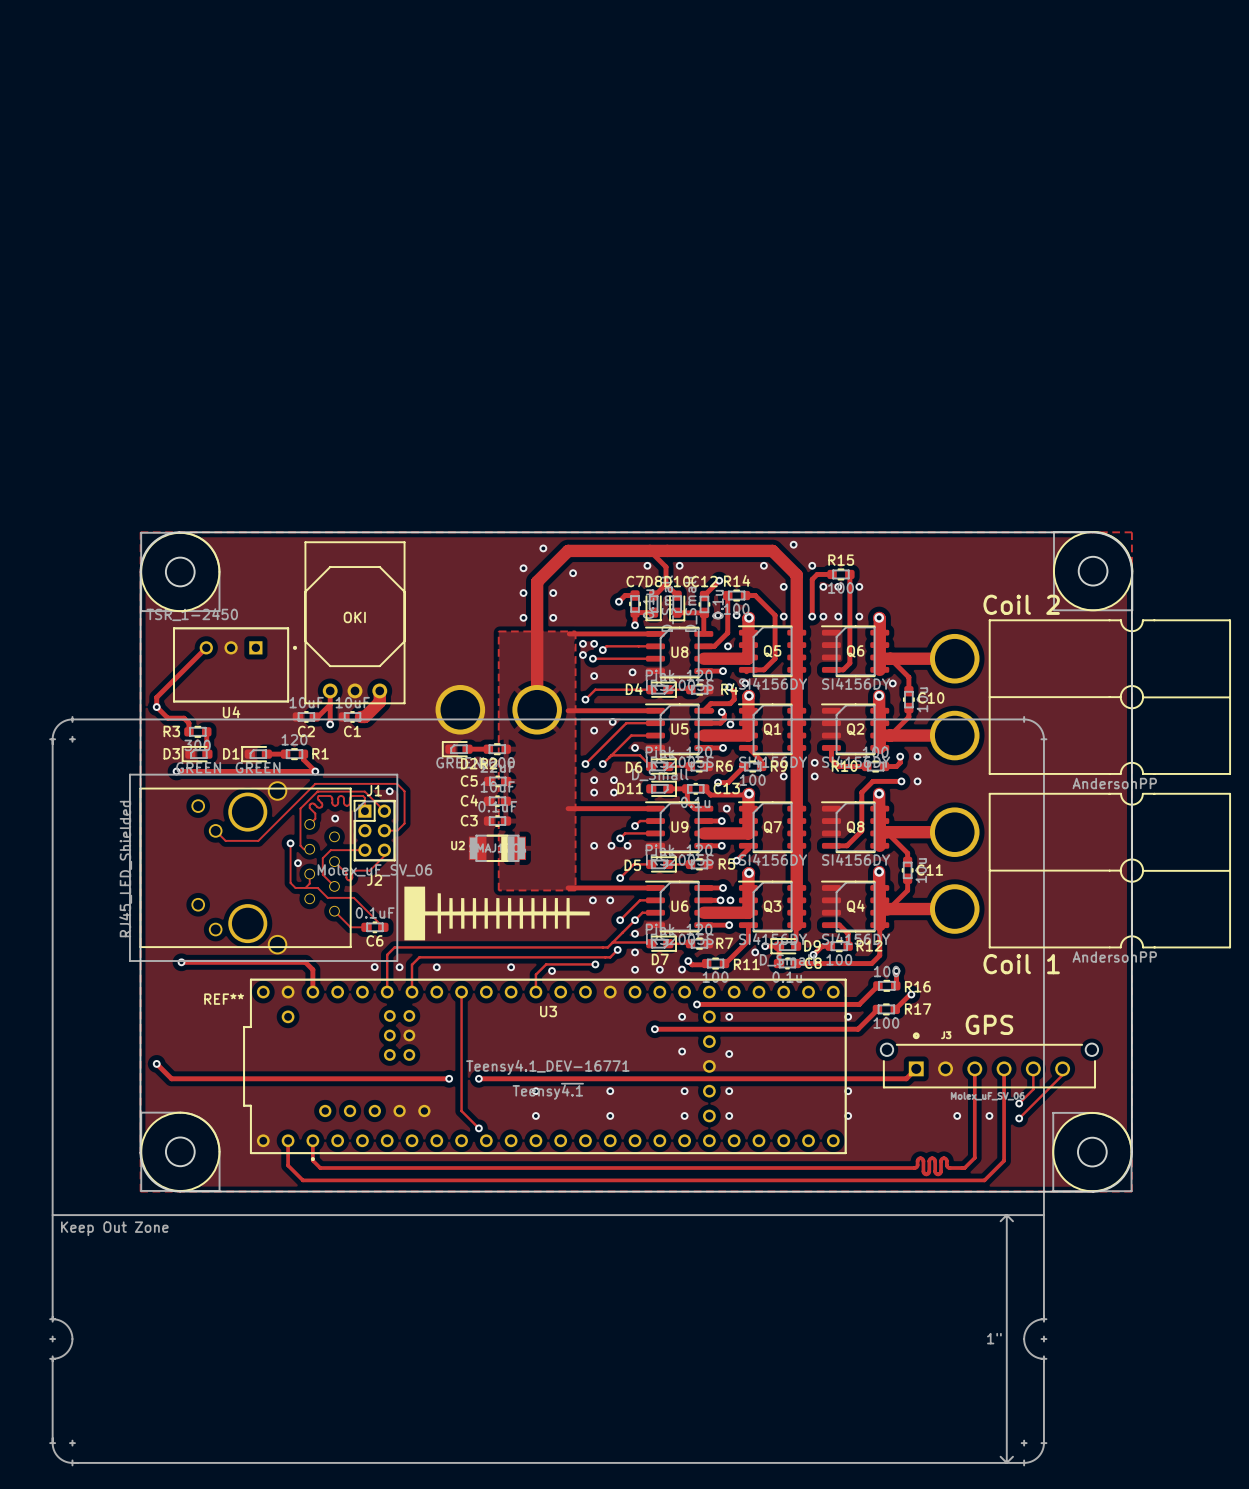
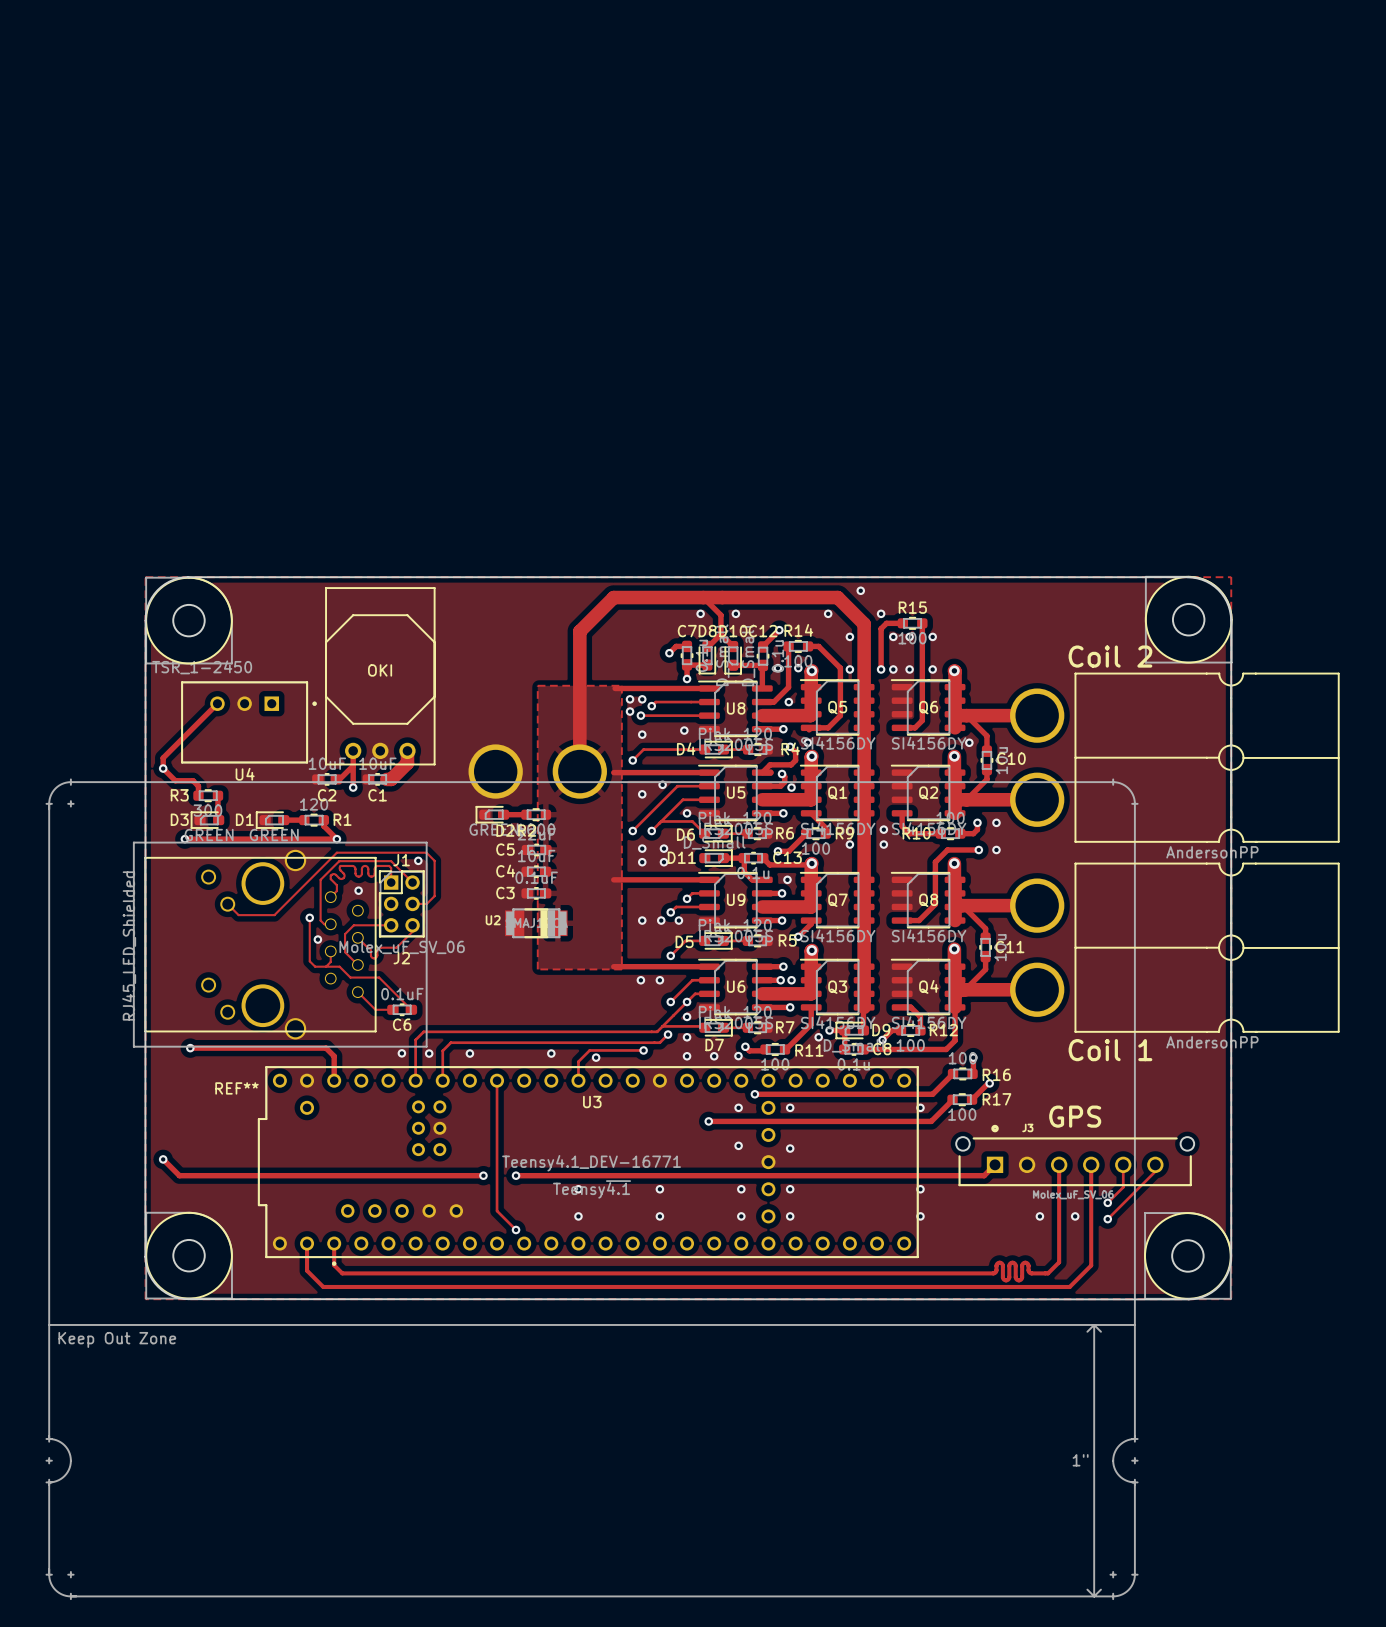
via: (543, 548) -> none
via: (523, 568) -> none
via: (573, 573) -> none
via: (523, 593) -> none
via: (553, 593) -> none
via: (523, 617) -> none
via: (553, 617) -> none
drawing: [404, 886, 590, 941] -> none

